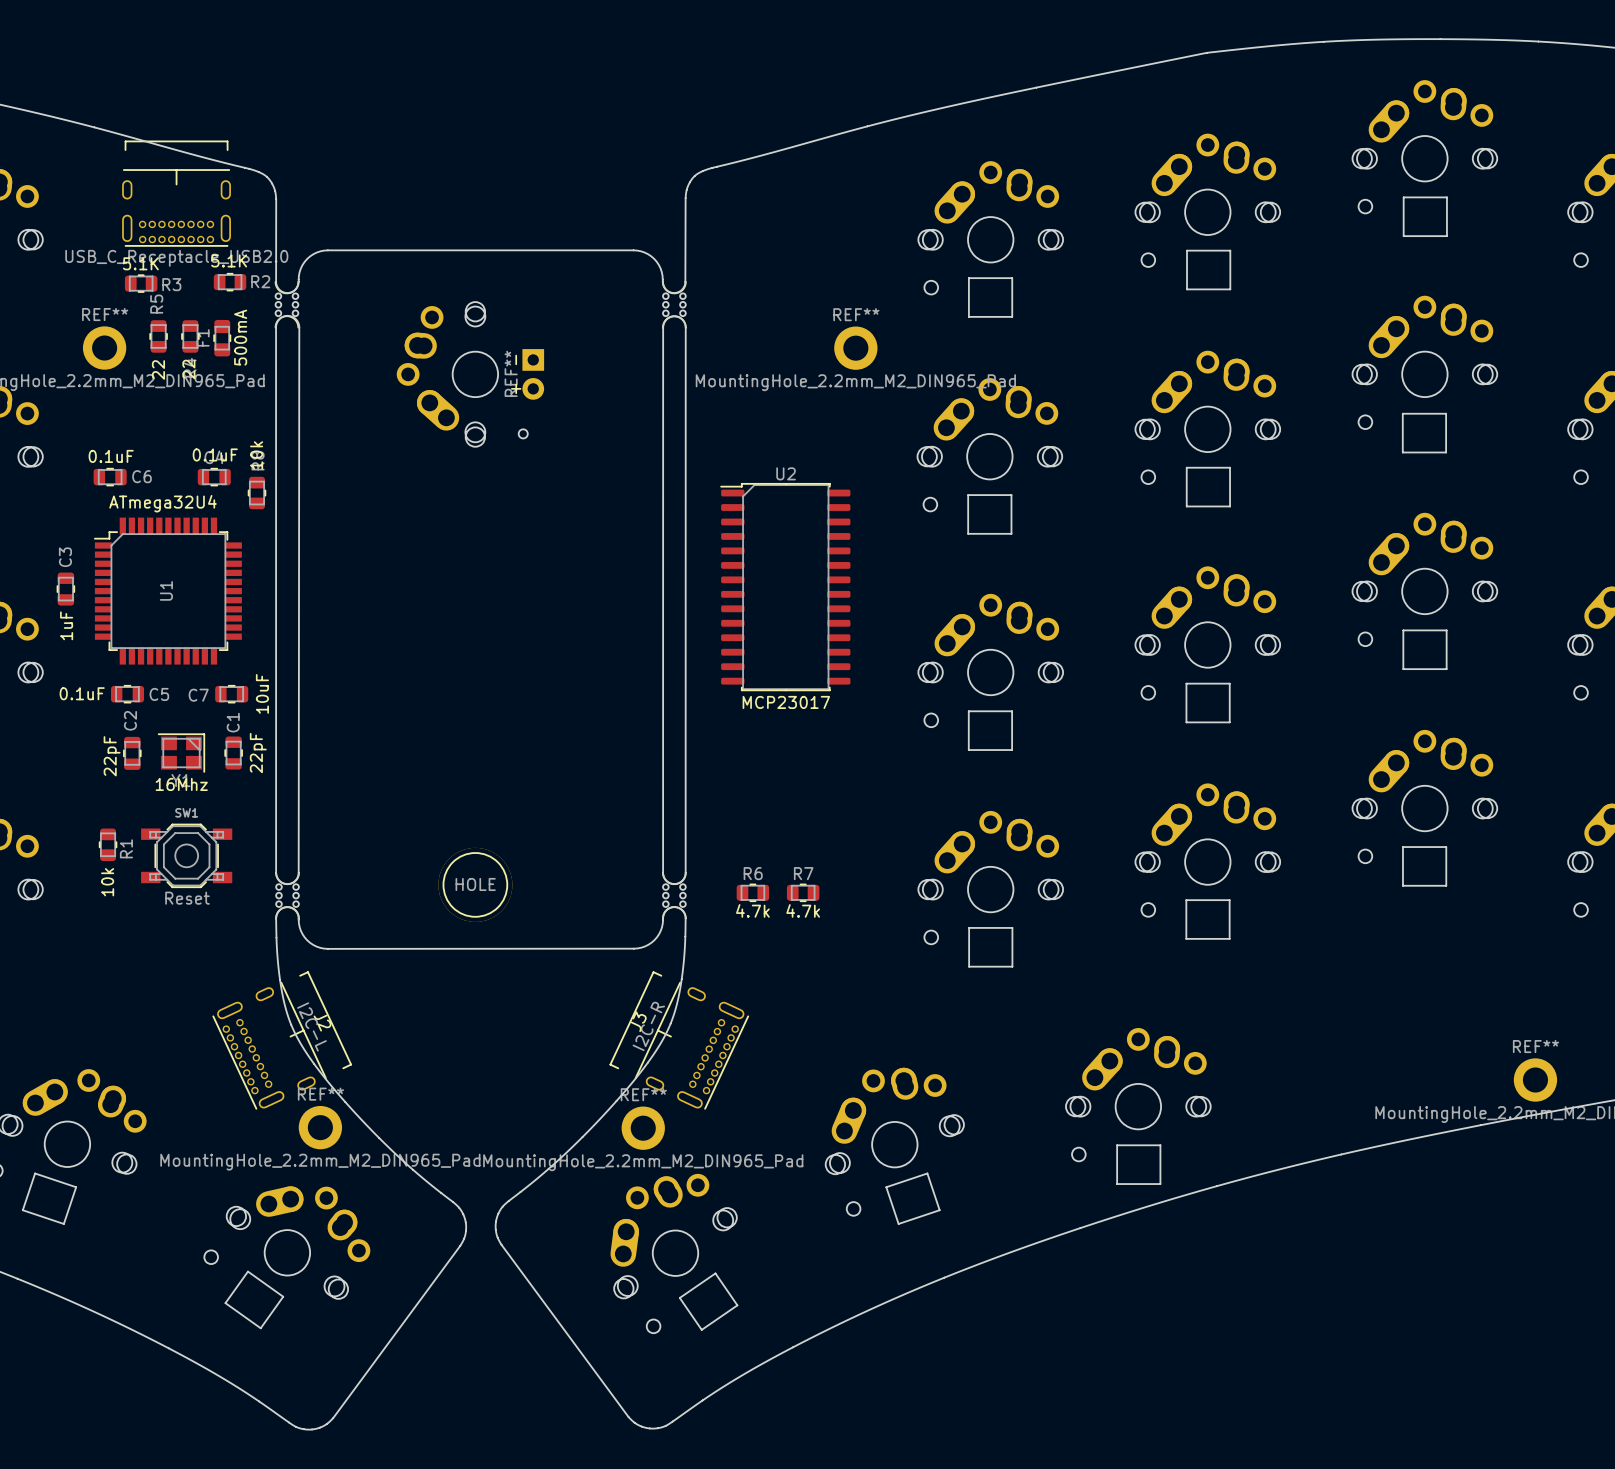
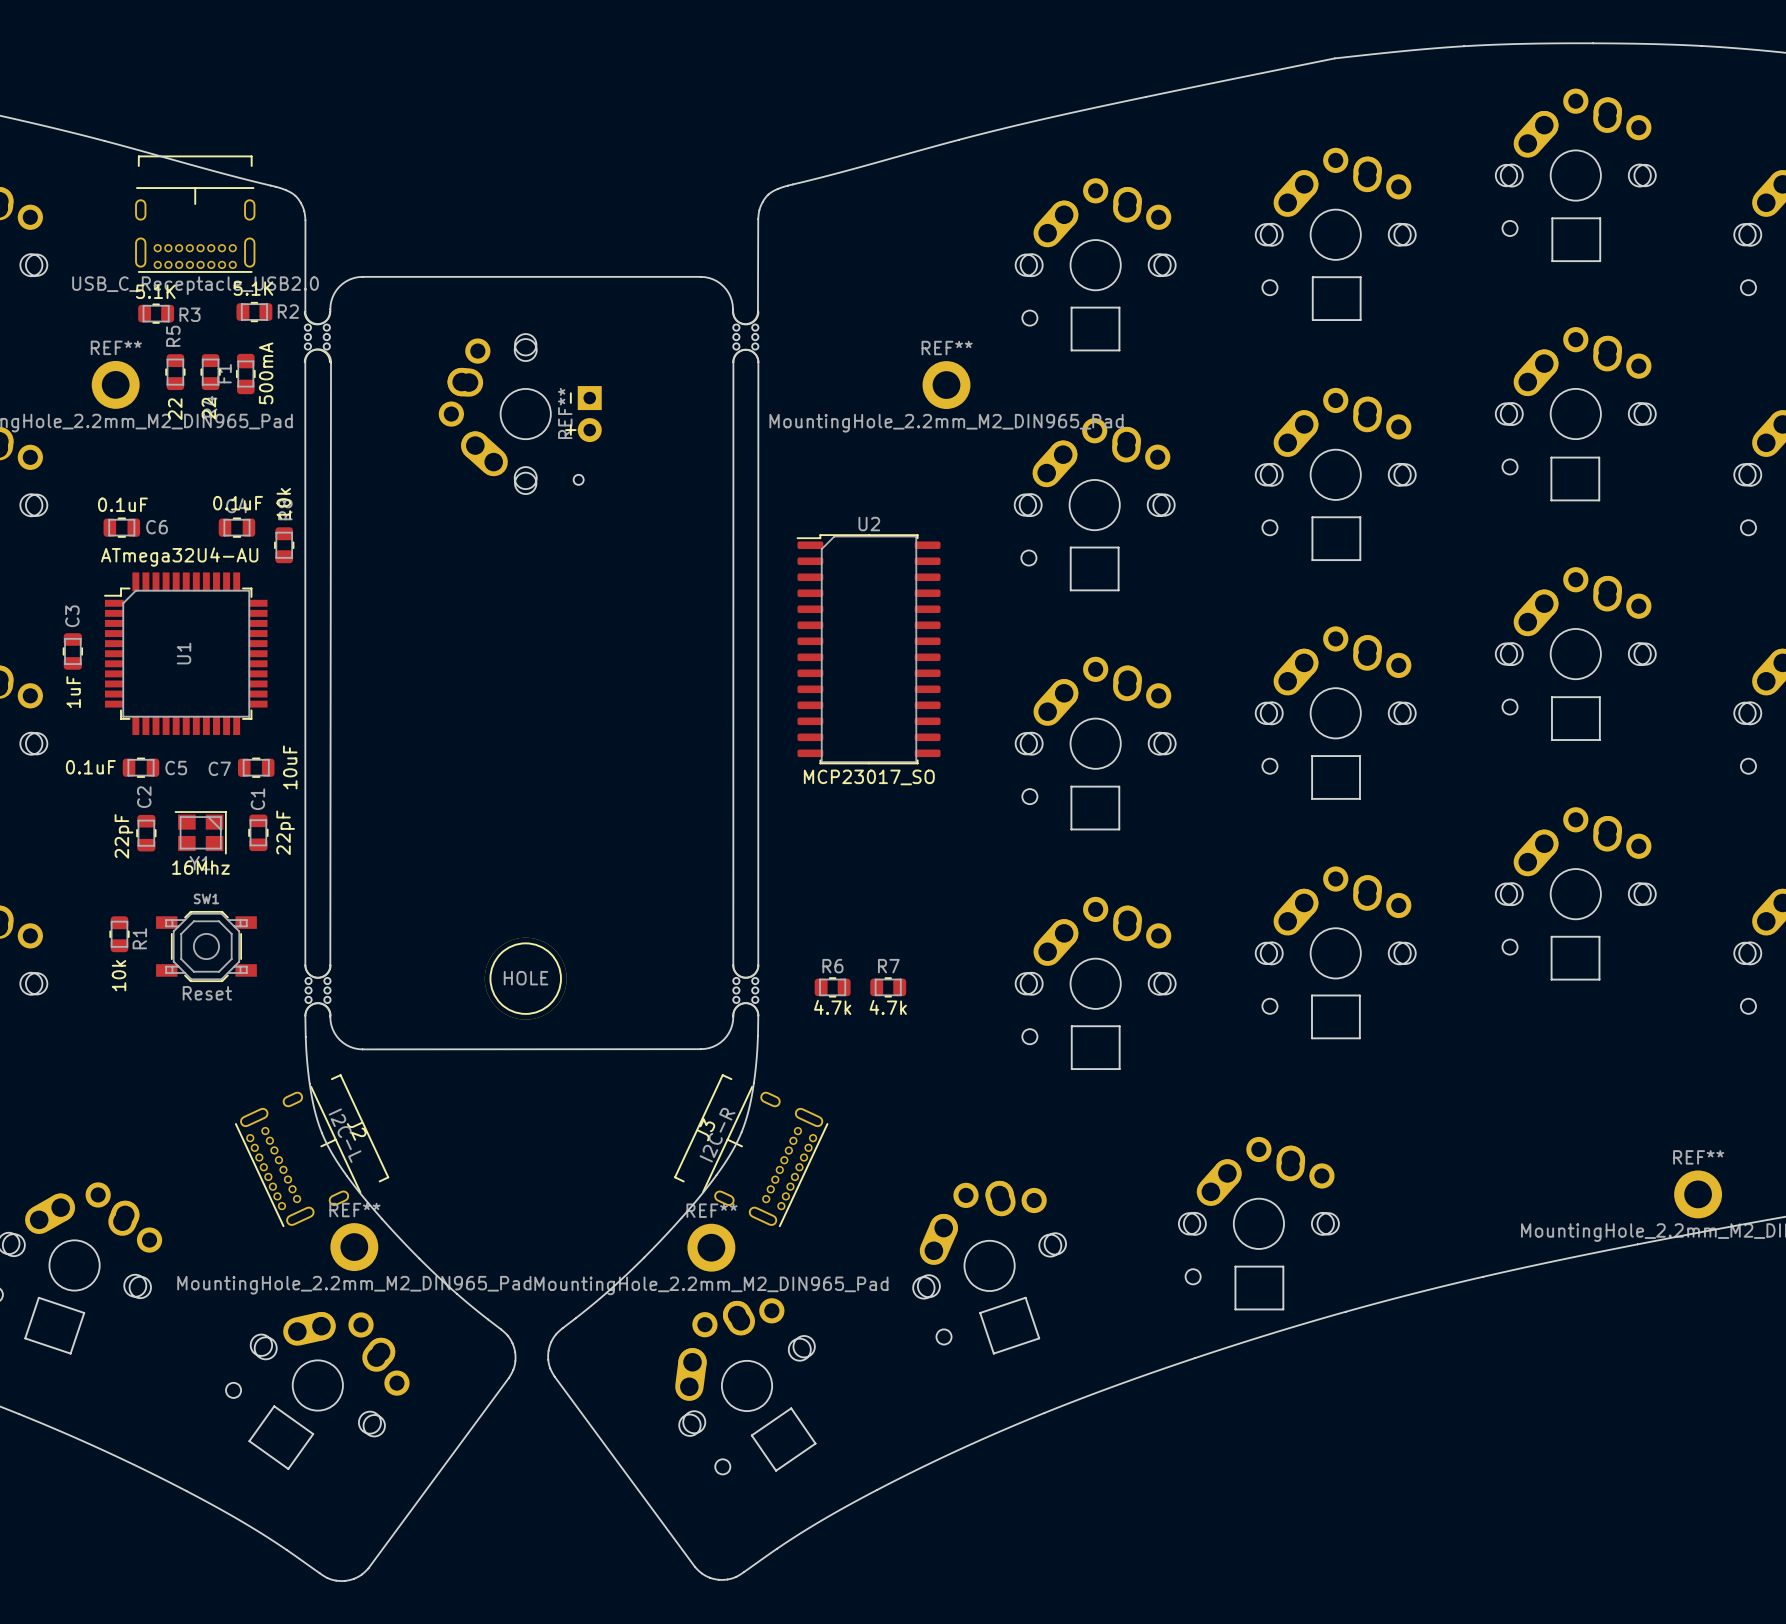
U1 value: ATmega32U4 (163, 503) -> ATmega32U4-AU (179, 557)
U2 value: MCP23017 (786, 702) -> MCP23017_SO (869, 777)

